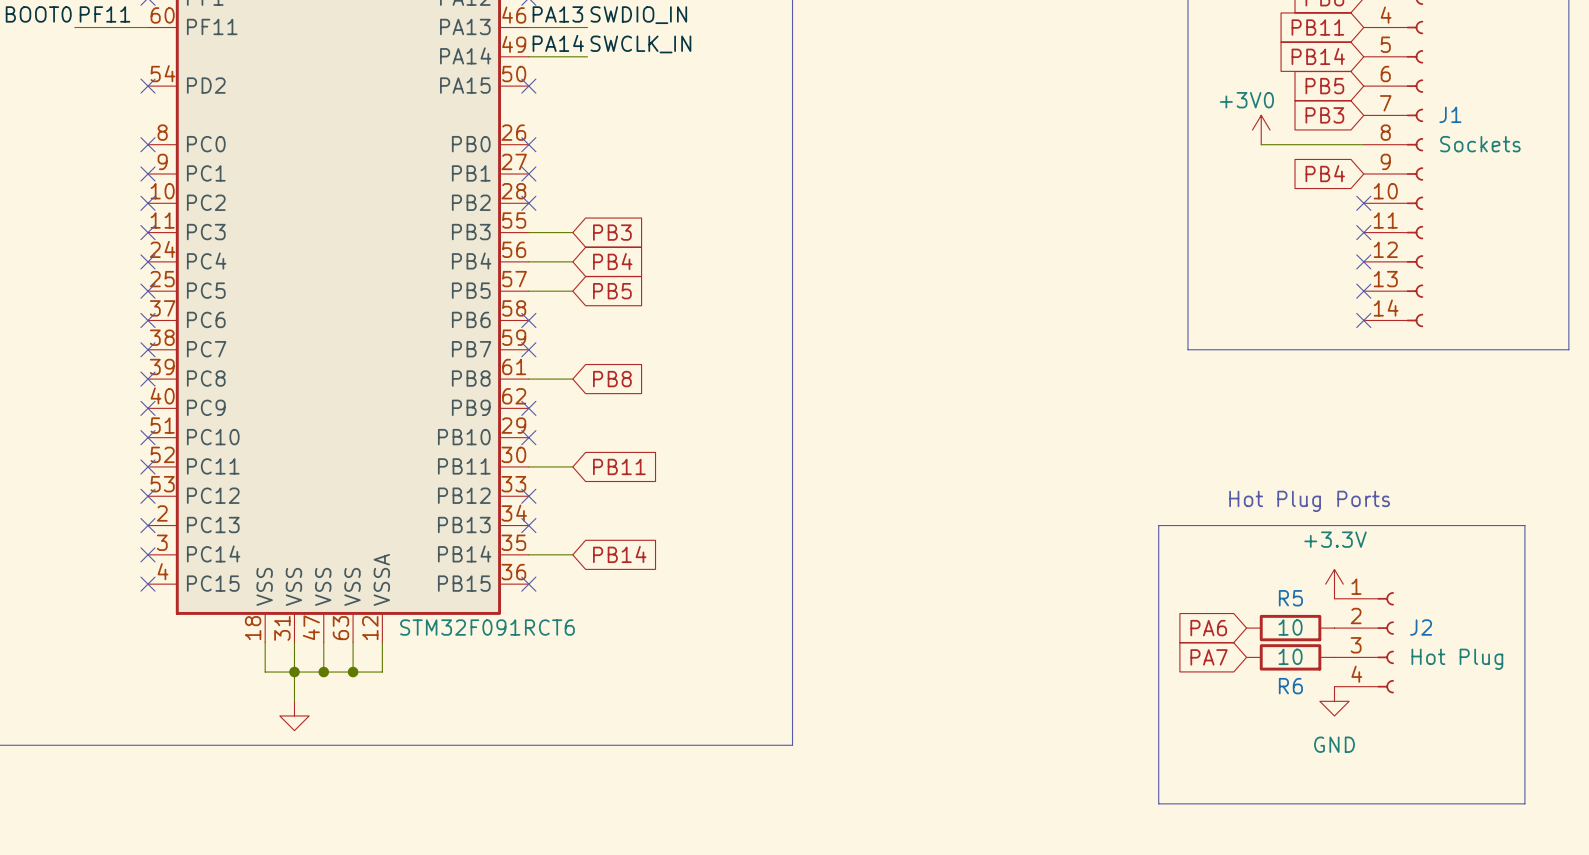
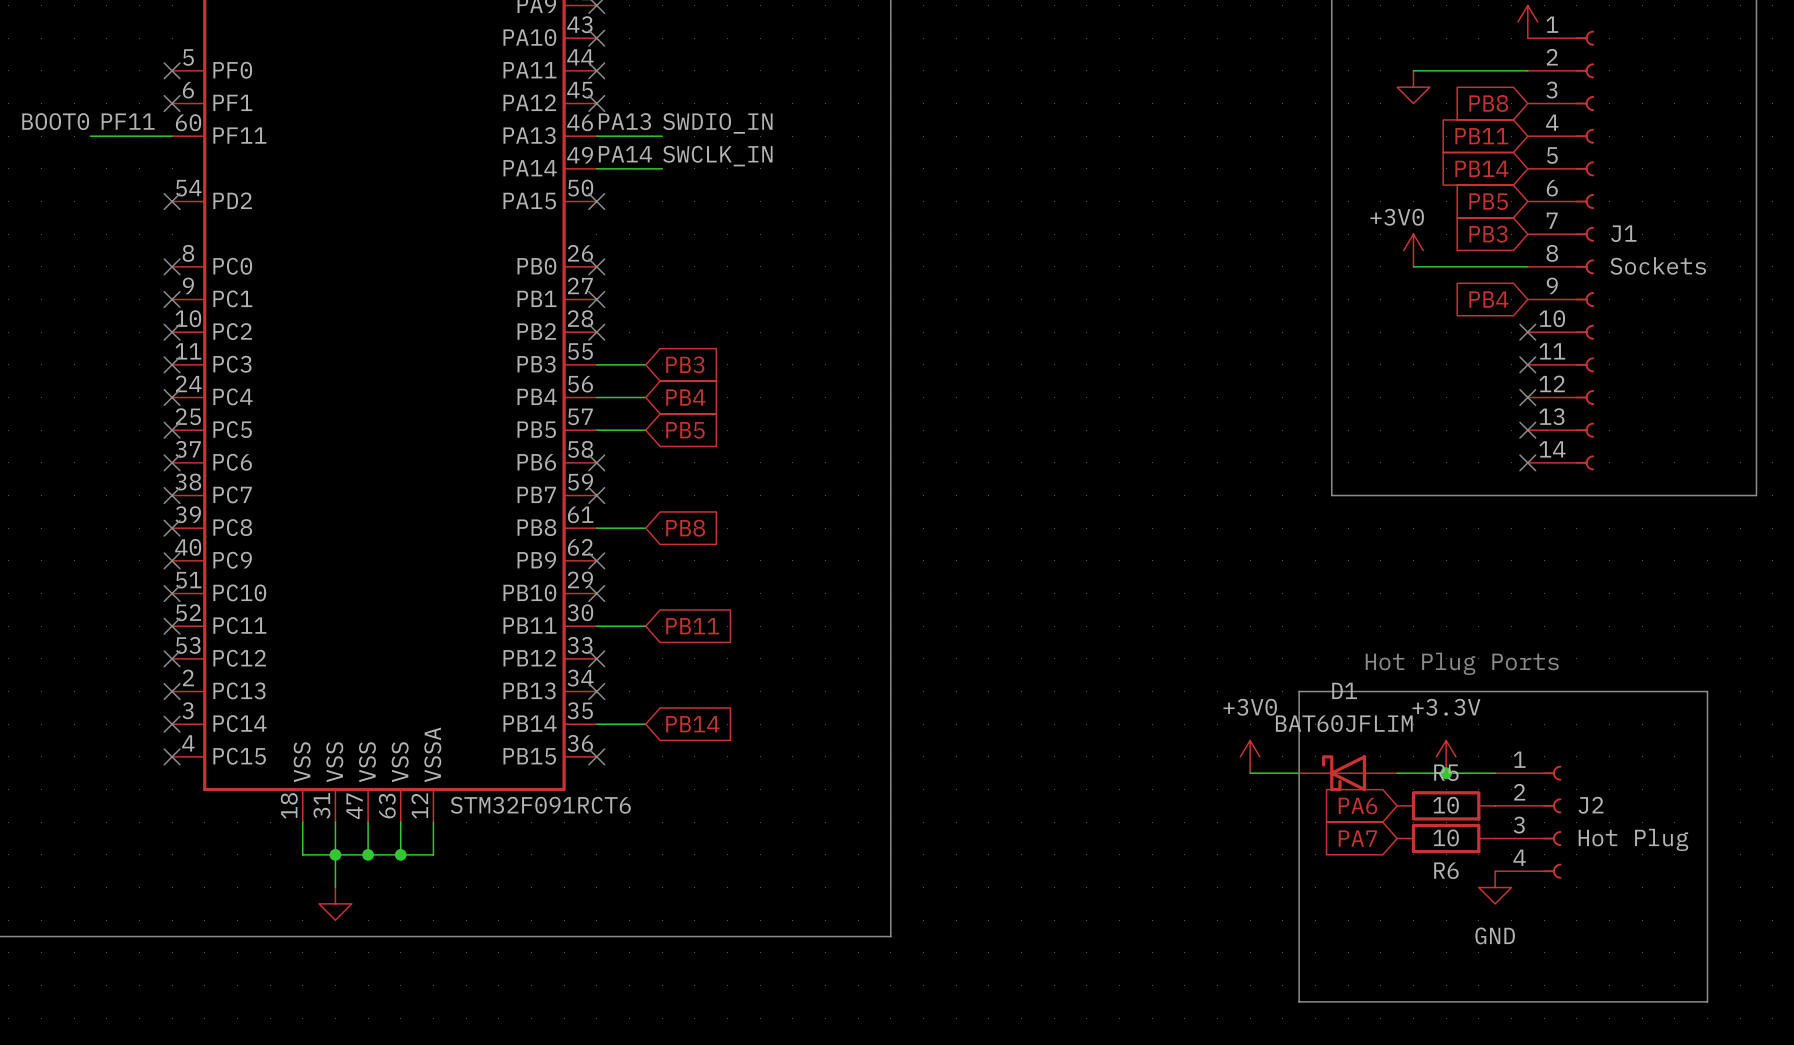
power symbol: none -> +3V0 (1250, 756)
power symbol position: +3.3V (1334, 584) -> +3.3V (1446, 756)
wire: none -> (1250, 773) (1299, 773)
D1: none -> BAT60JFLIM (1348, 773)
wire: none -> (1397, 773) (1495, 773)
junction: none -> (1446, 773)

